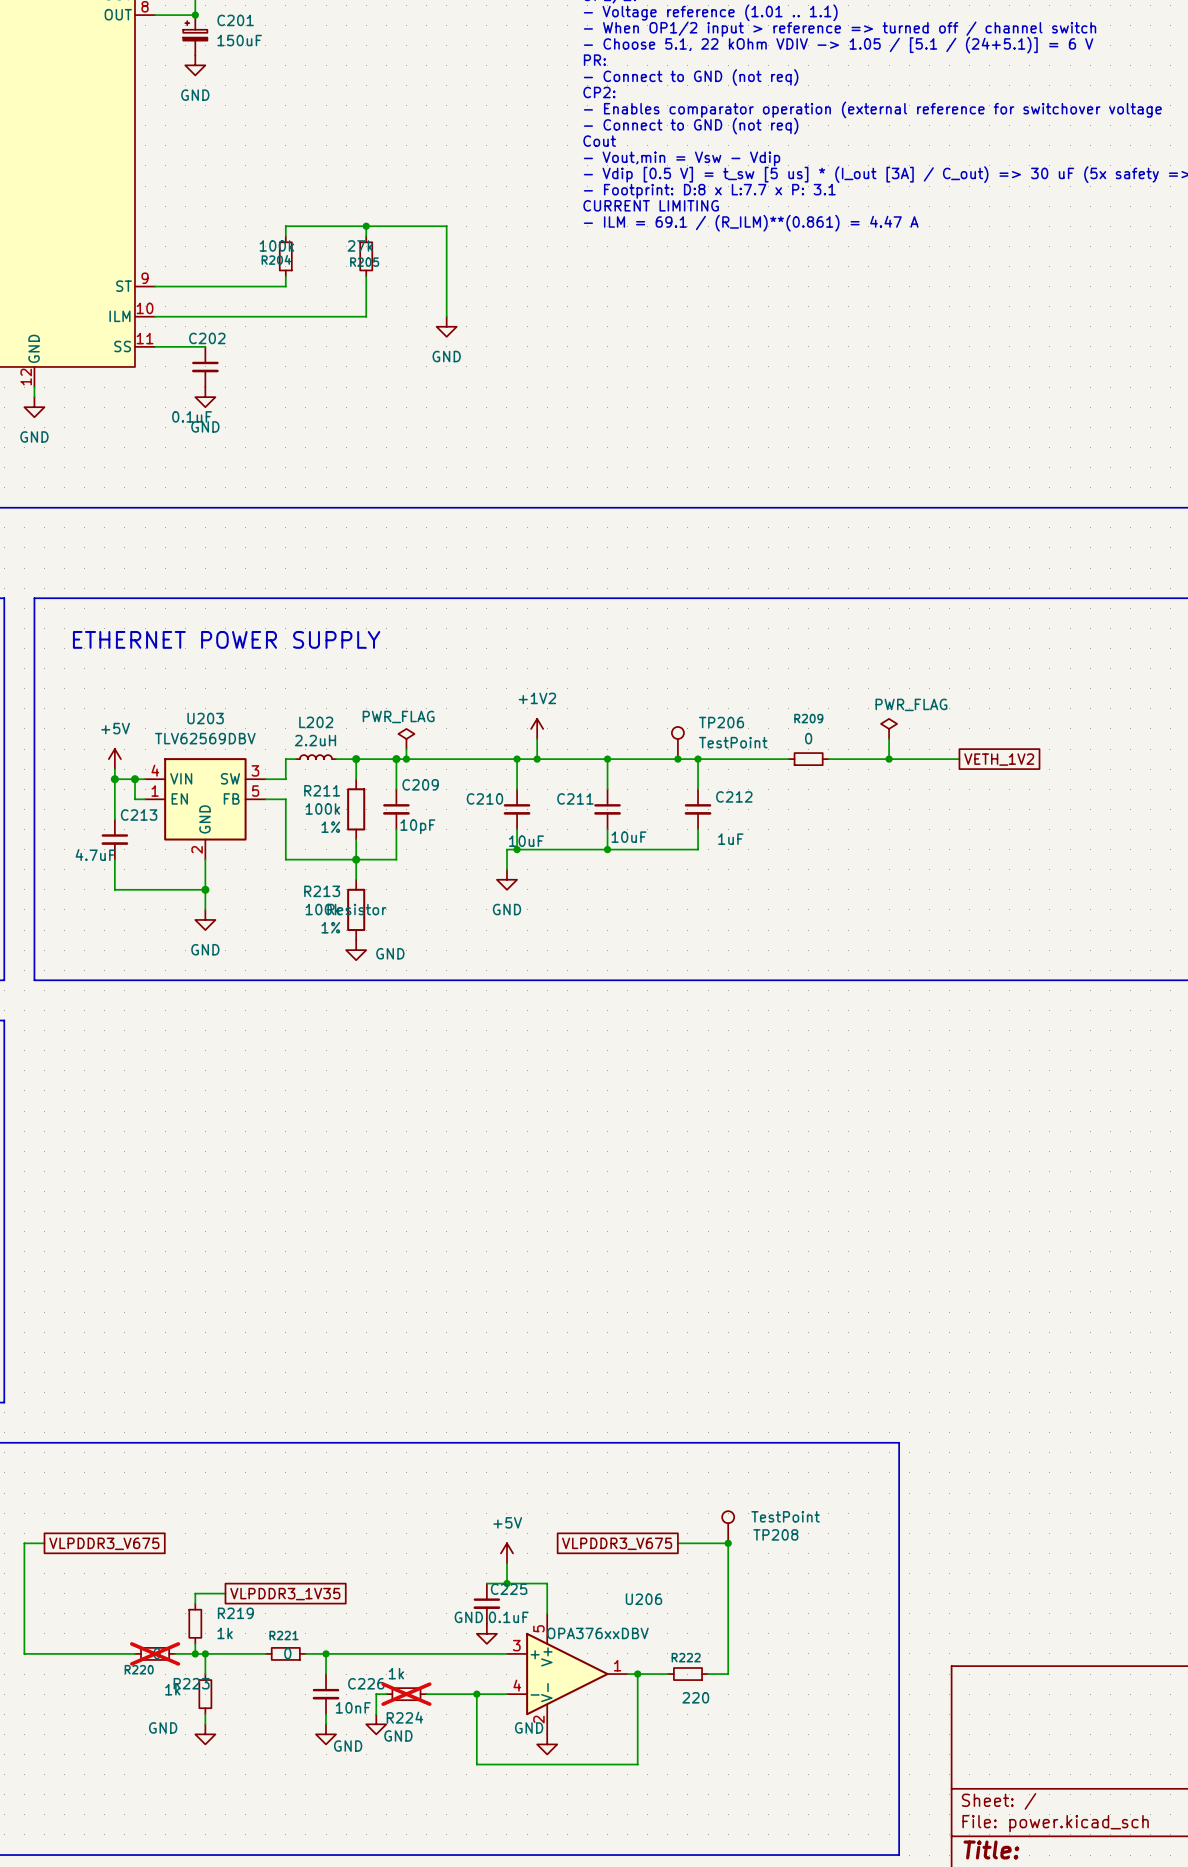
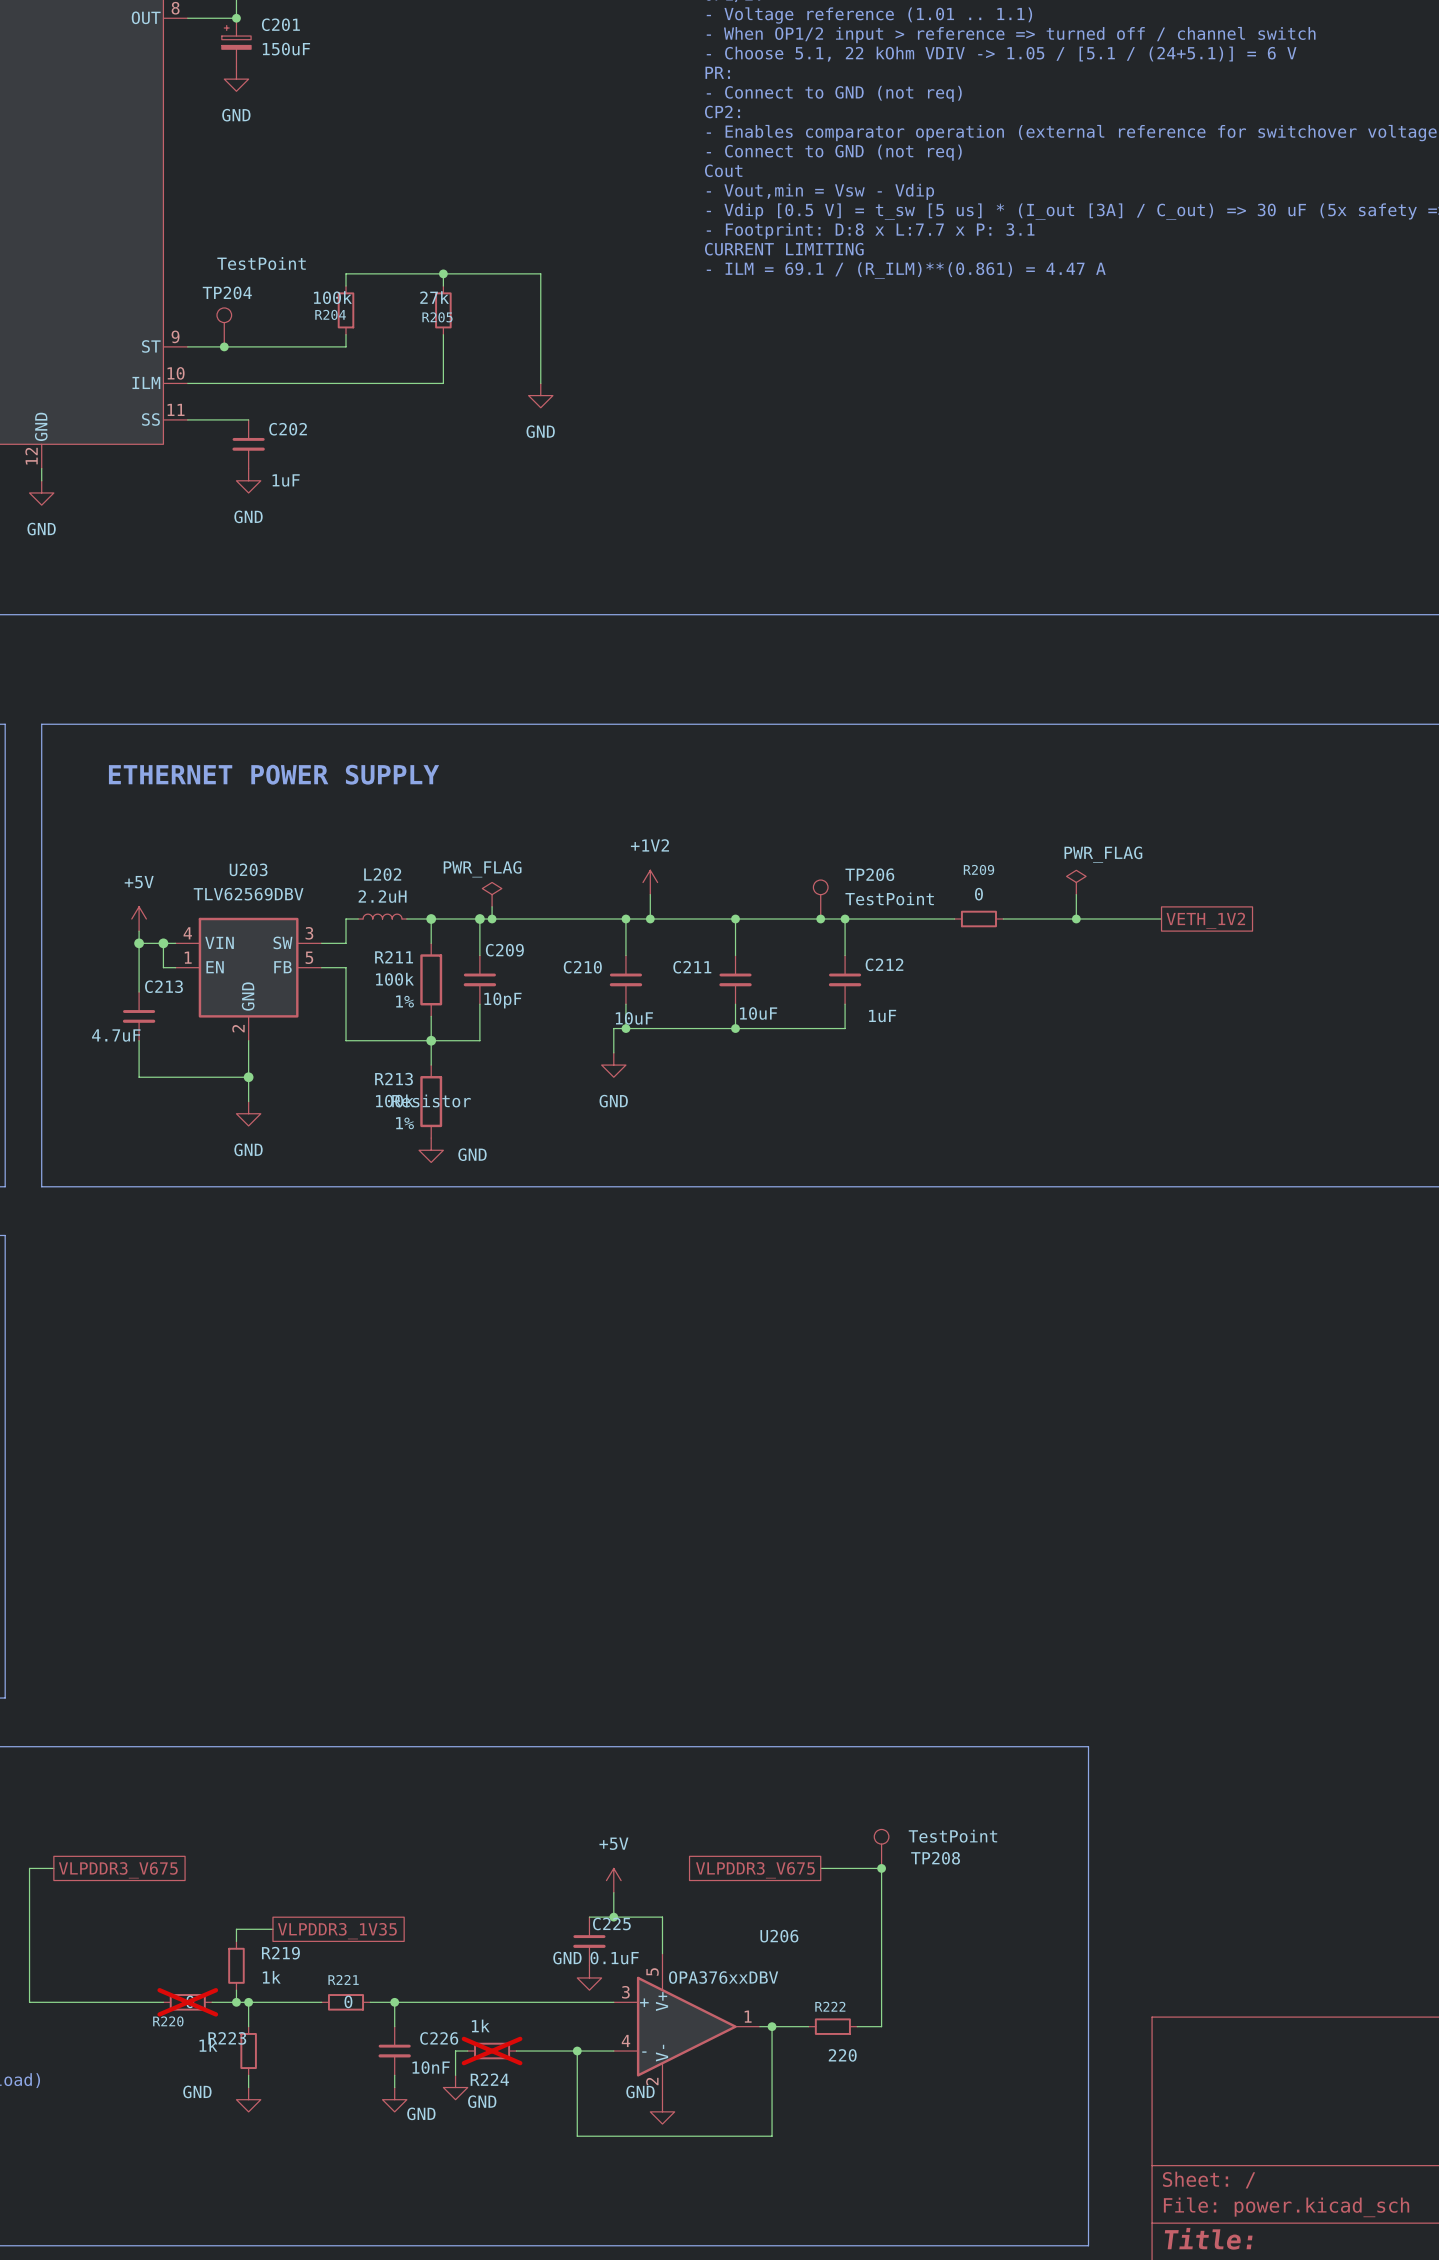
TP204: none -> TestPoint (224, 327)
junction: none -> (224, 346)
C202 name position: C202 (207, 338) -> C202 (288, 429)
C202 value: 0.1uF (192, 416) -> 1uF (286, 480)

